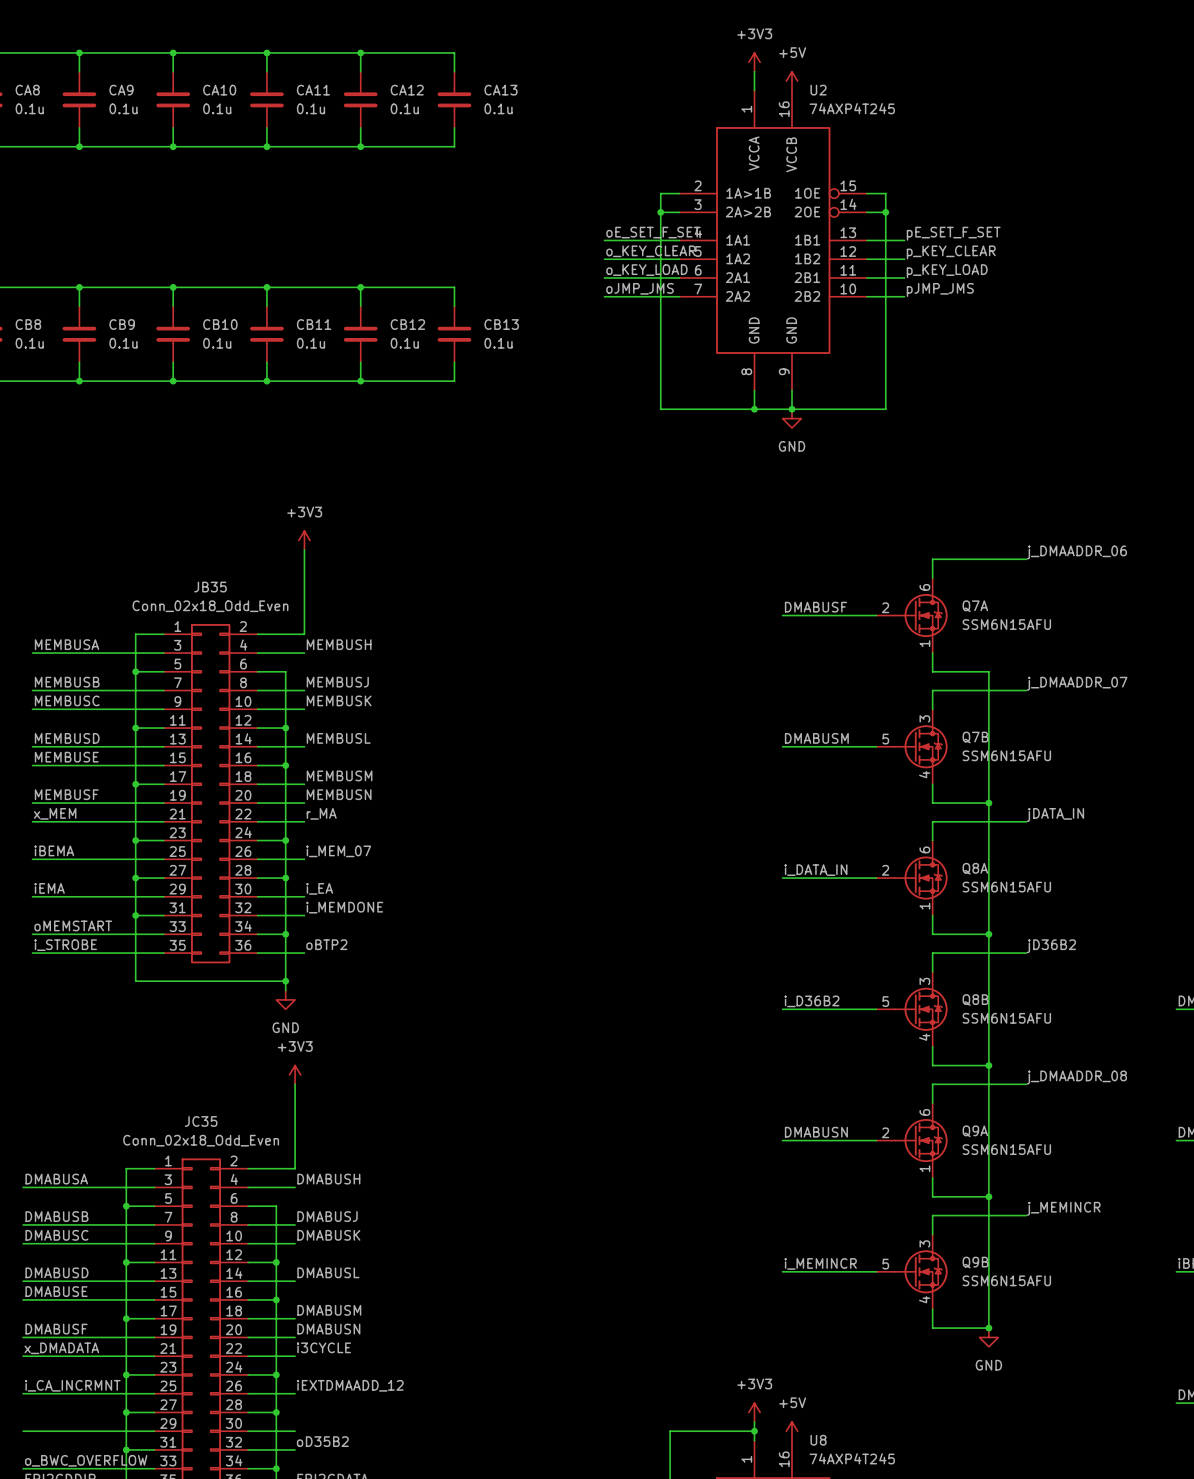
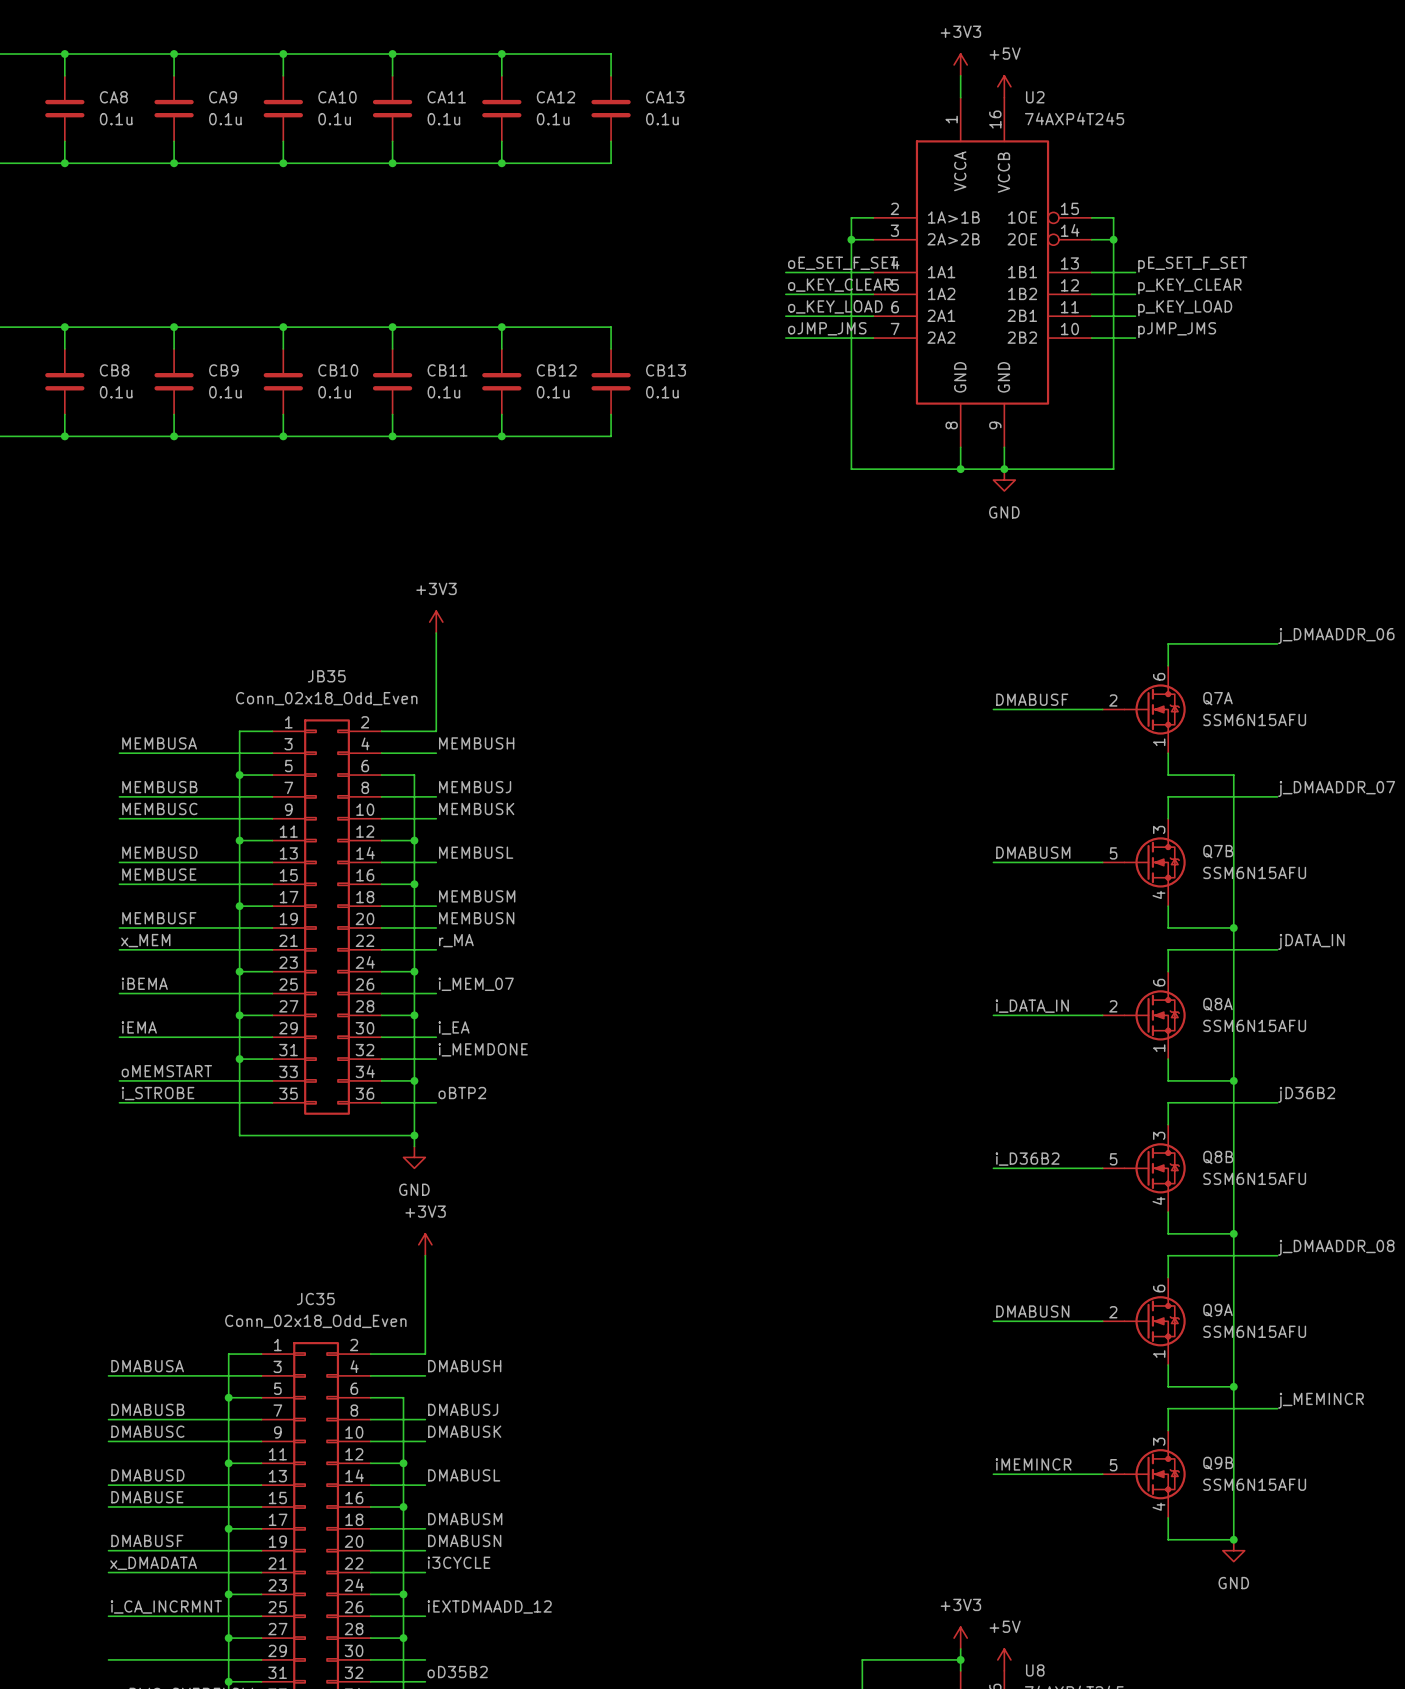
label: i_MEMINCR (820, 1263) -> iMEMINCR (1033, 1464)

